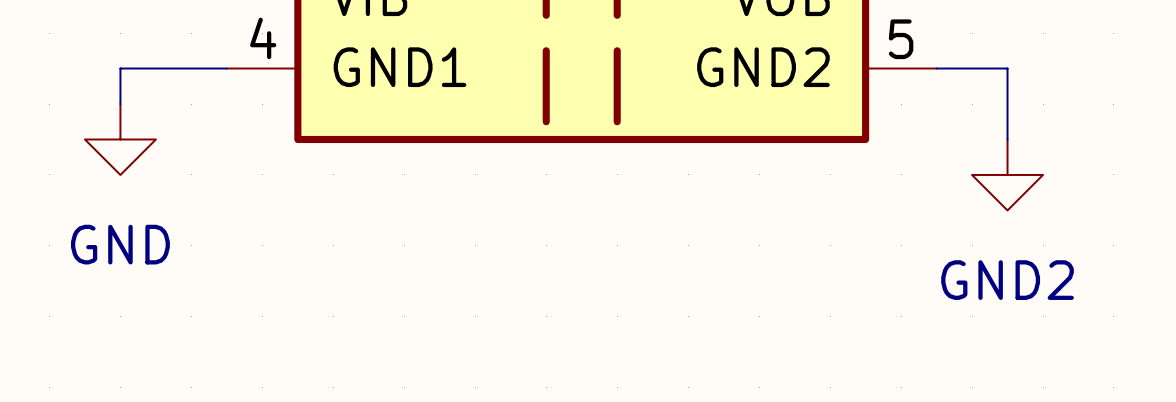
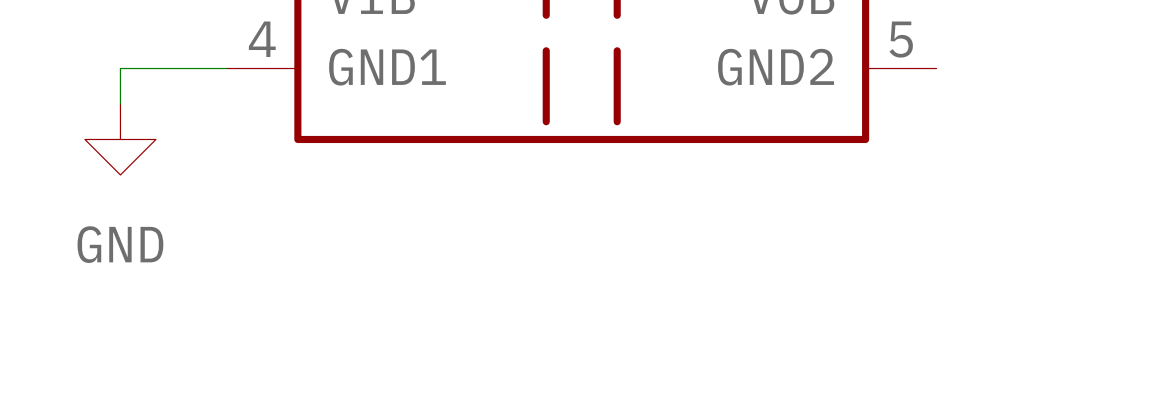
wire: (936, 68) (1007, 68) (1007, 139) -> none
power symbol: GND2 (1007, 174) -> none

